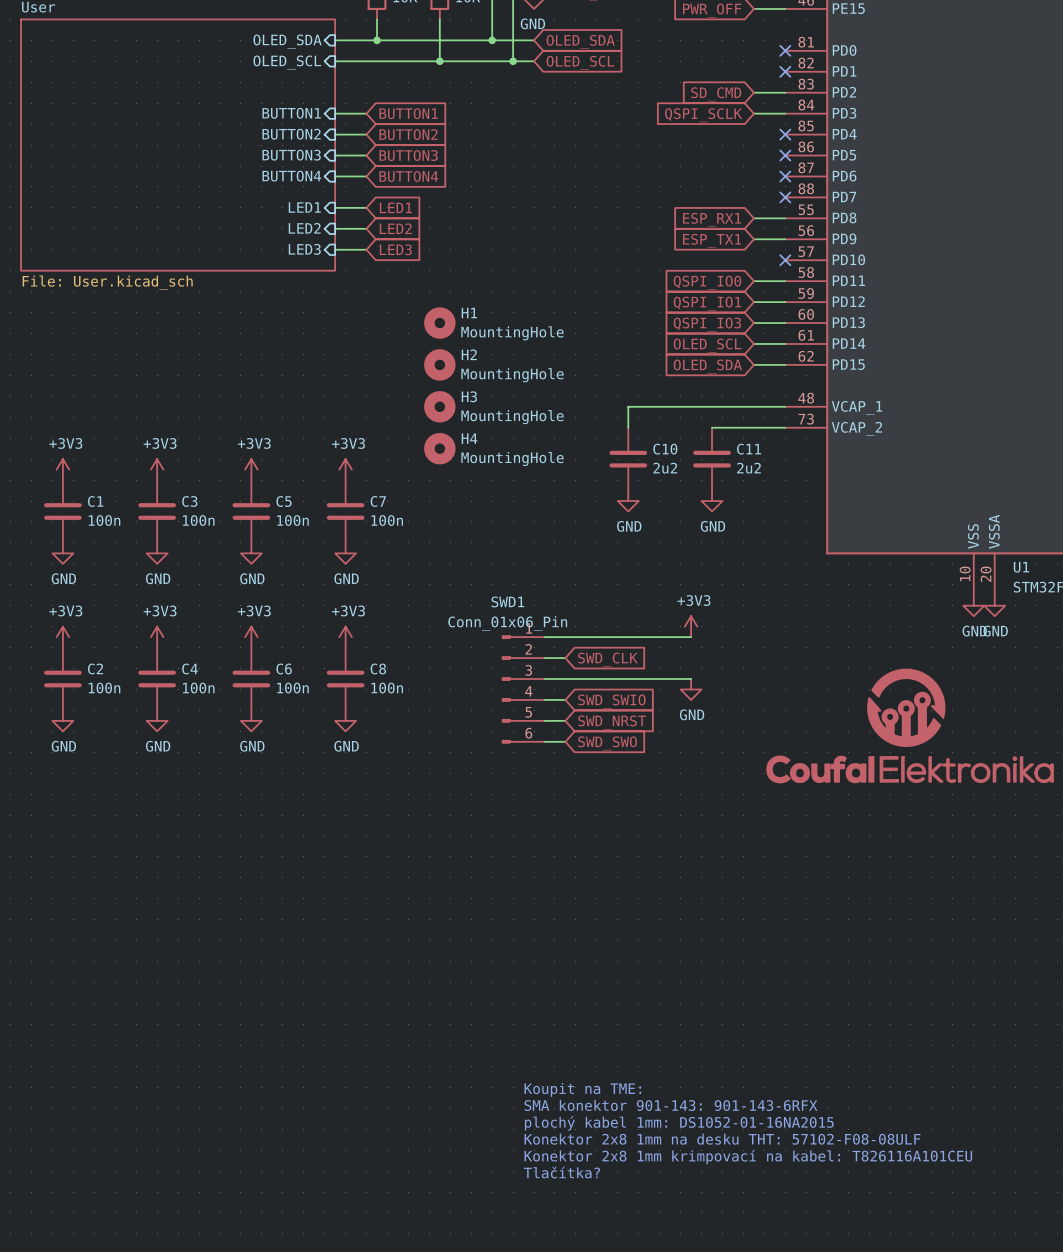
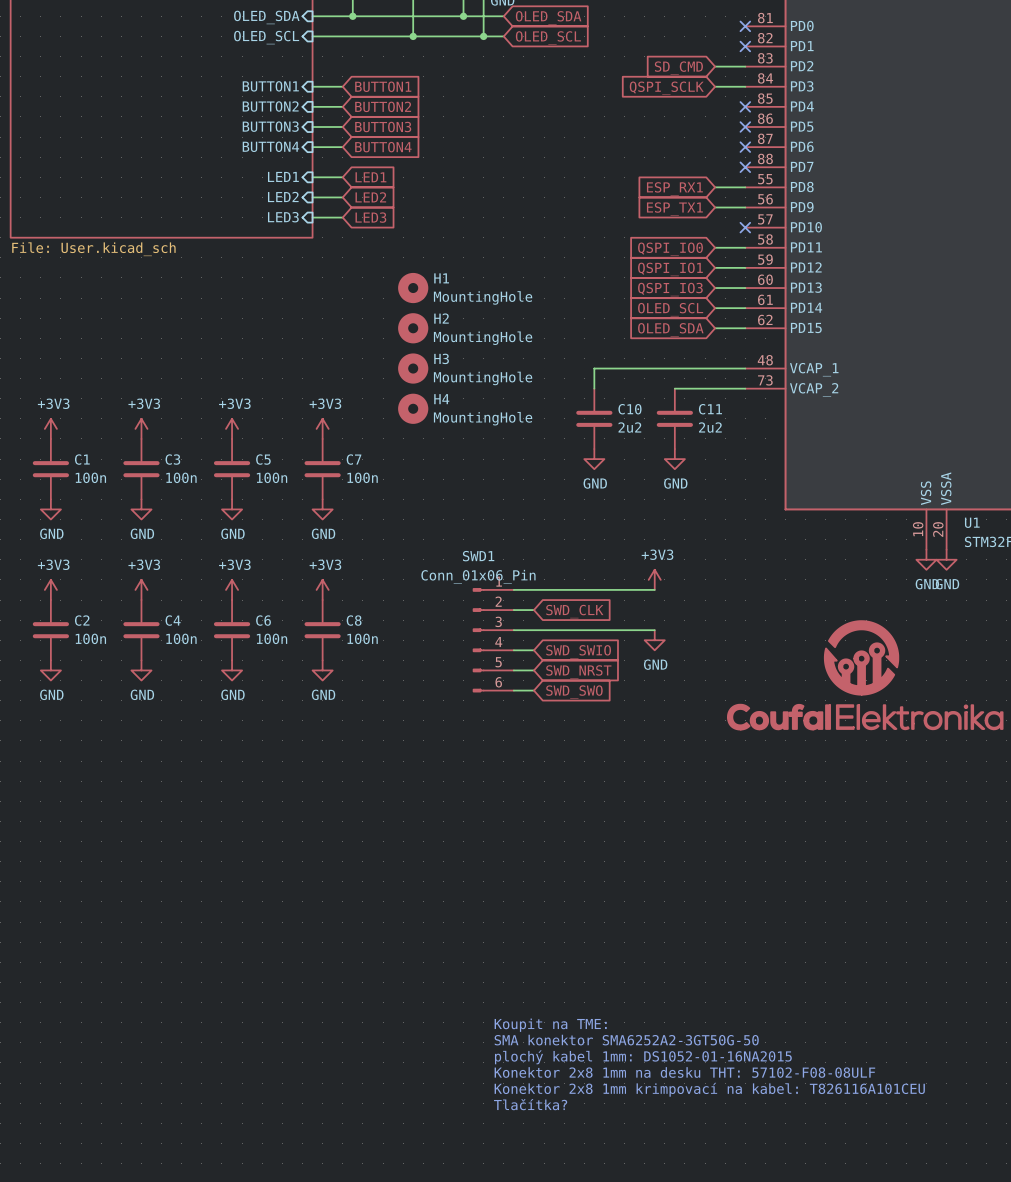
text: SMA konektor 901-143: 901-143-6RFX (670, 1105) -> SMA konektor SMA6252A2-3GT50G-50 (626, 1040)

